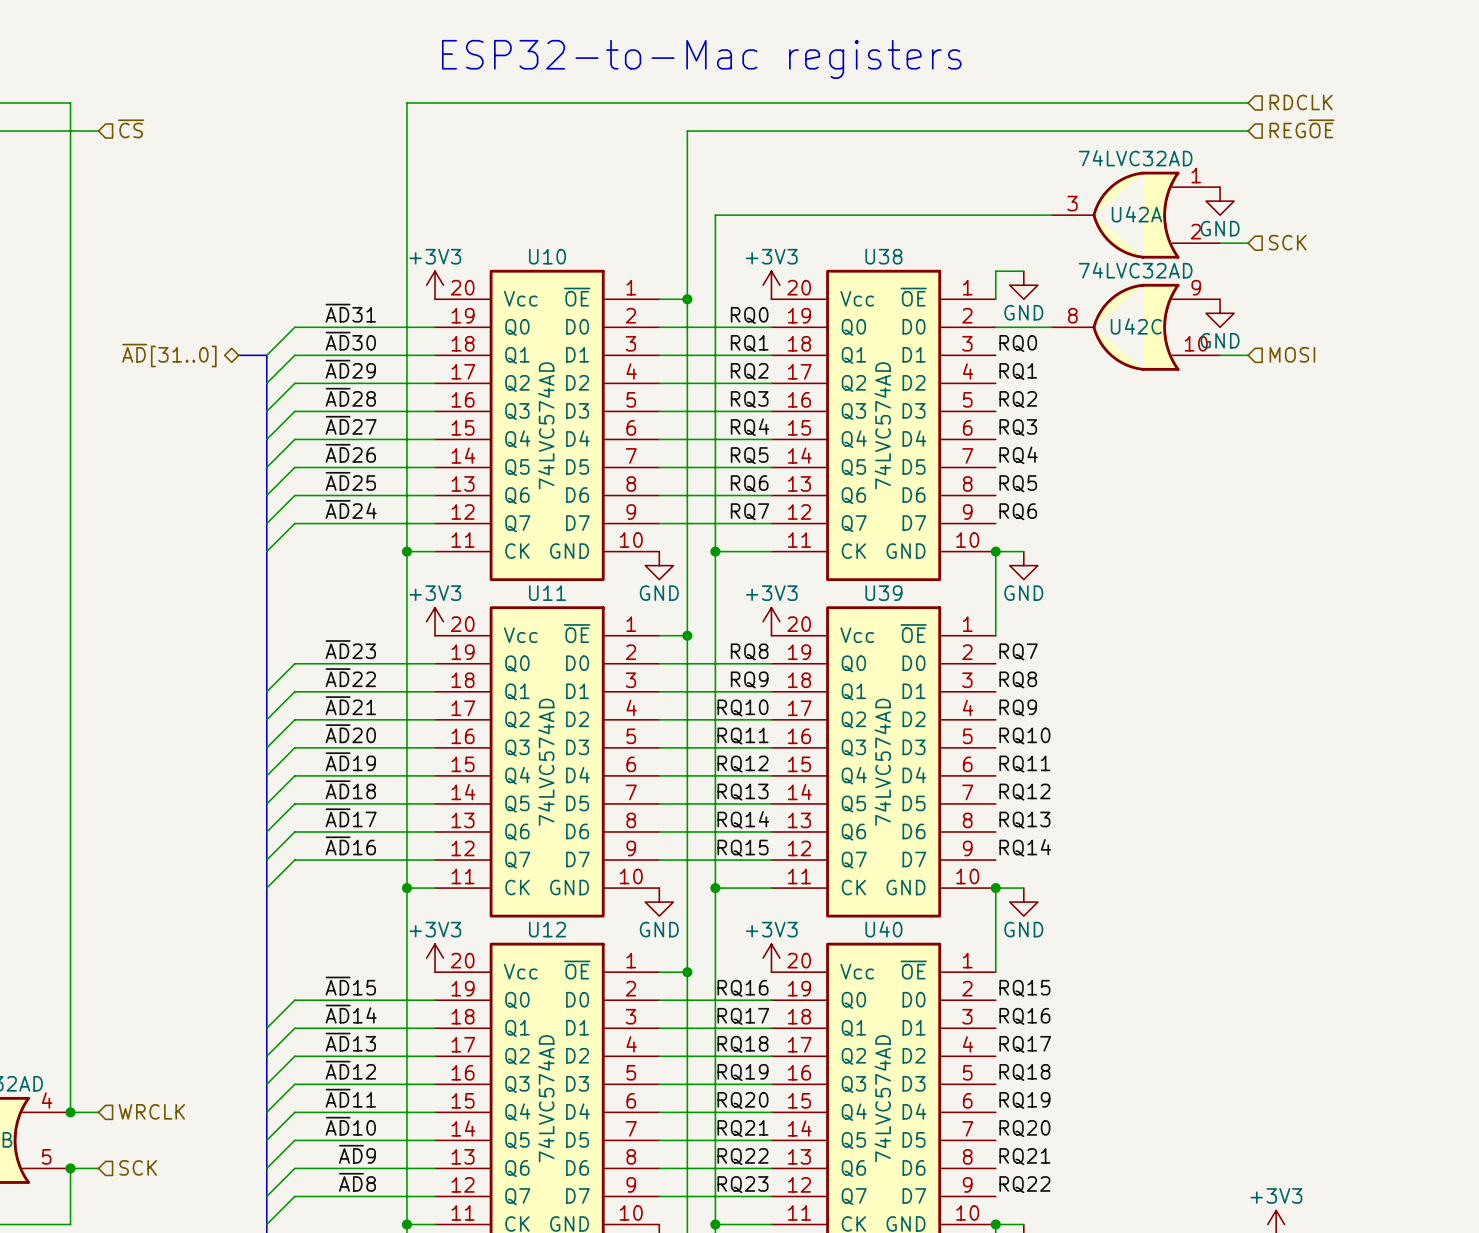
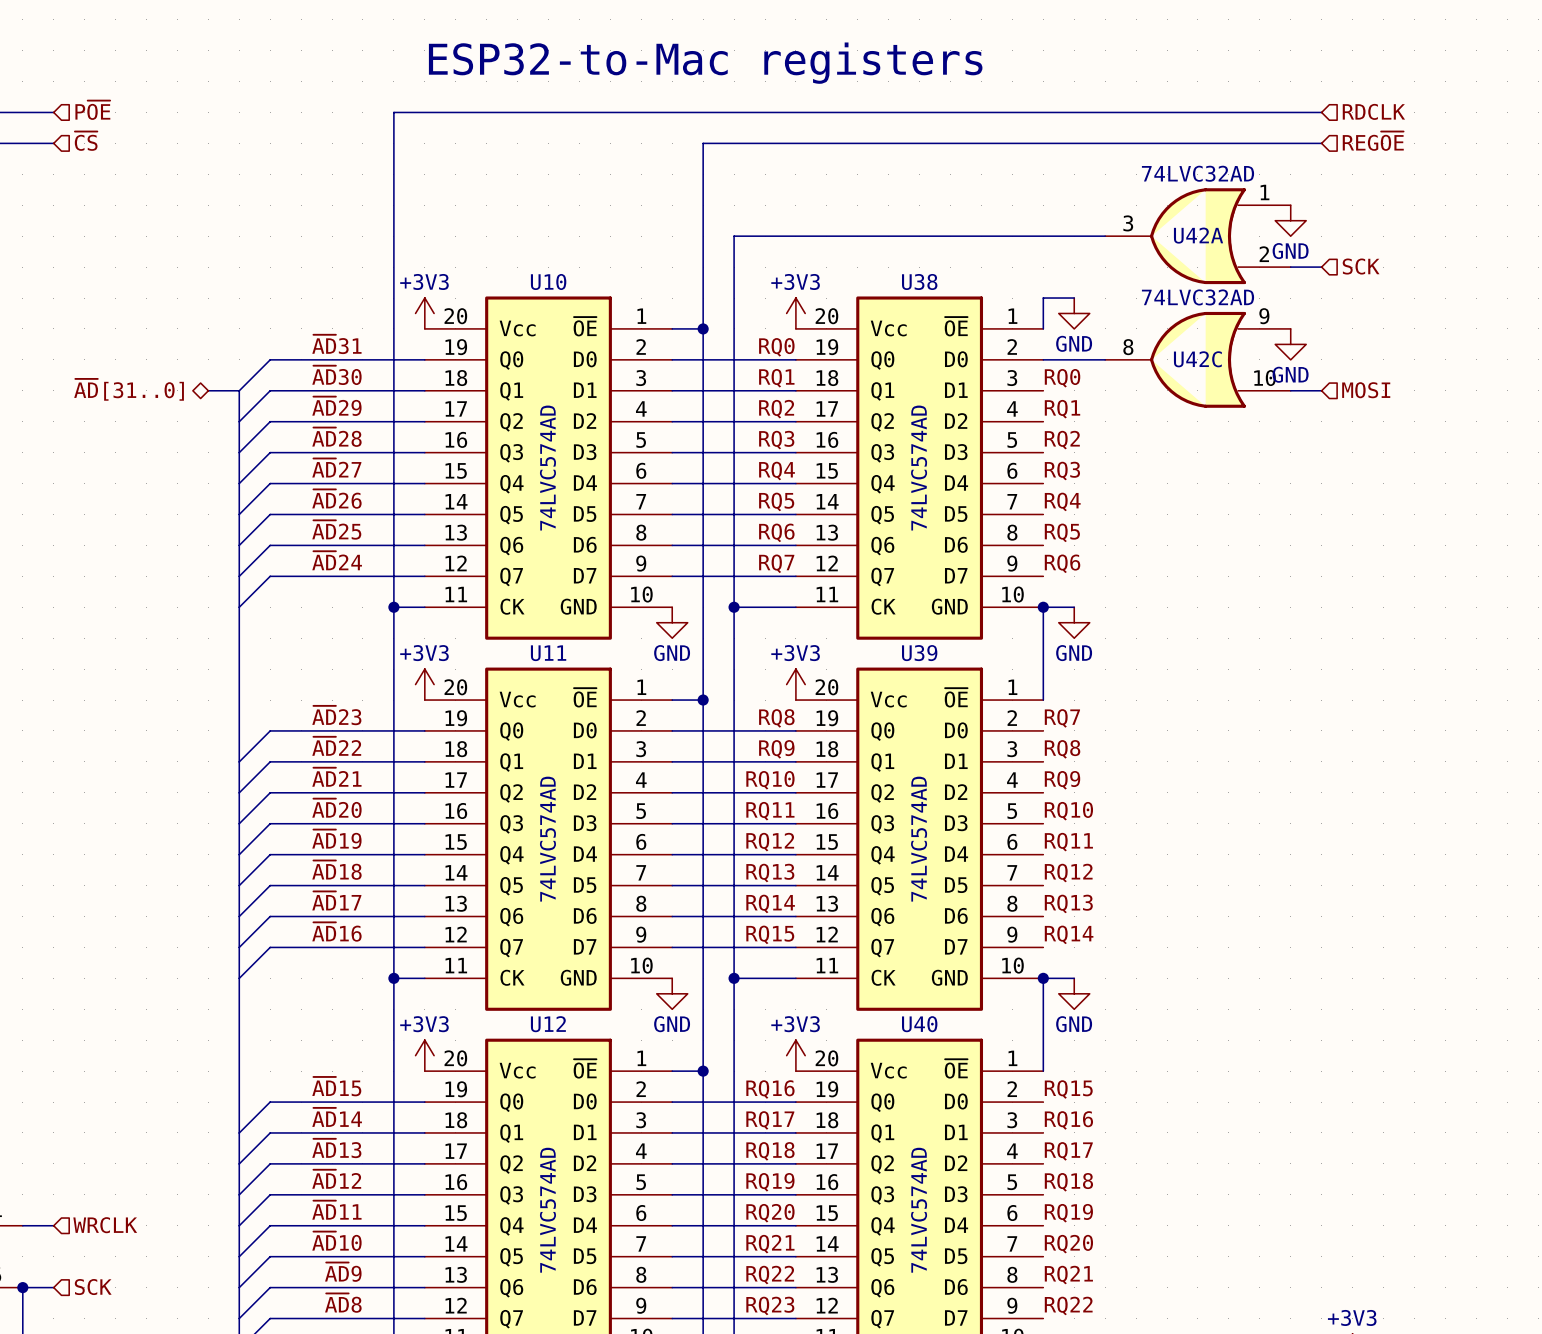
hierarchical label: none -> P~{OE} (92, 110)
wire: (70, 103) (70, 1112) -> (22, 112) (53, 112)
junction: (70, 1112) -> none

